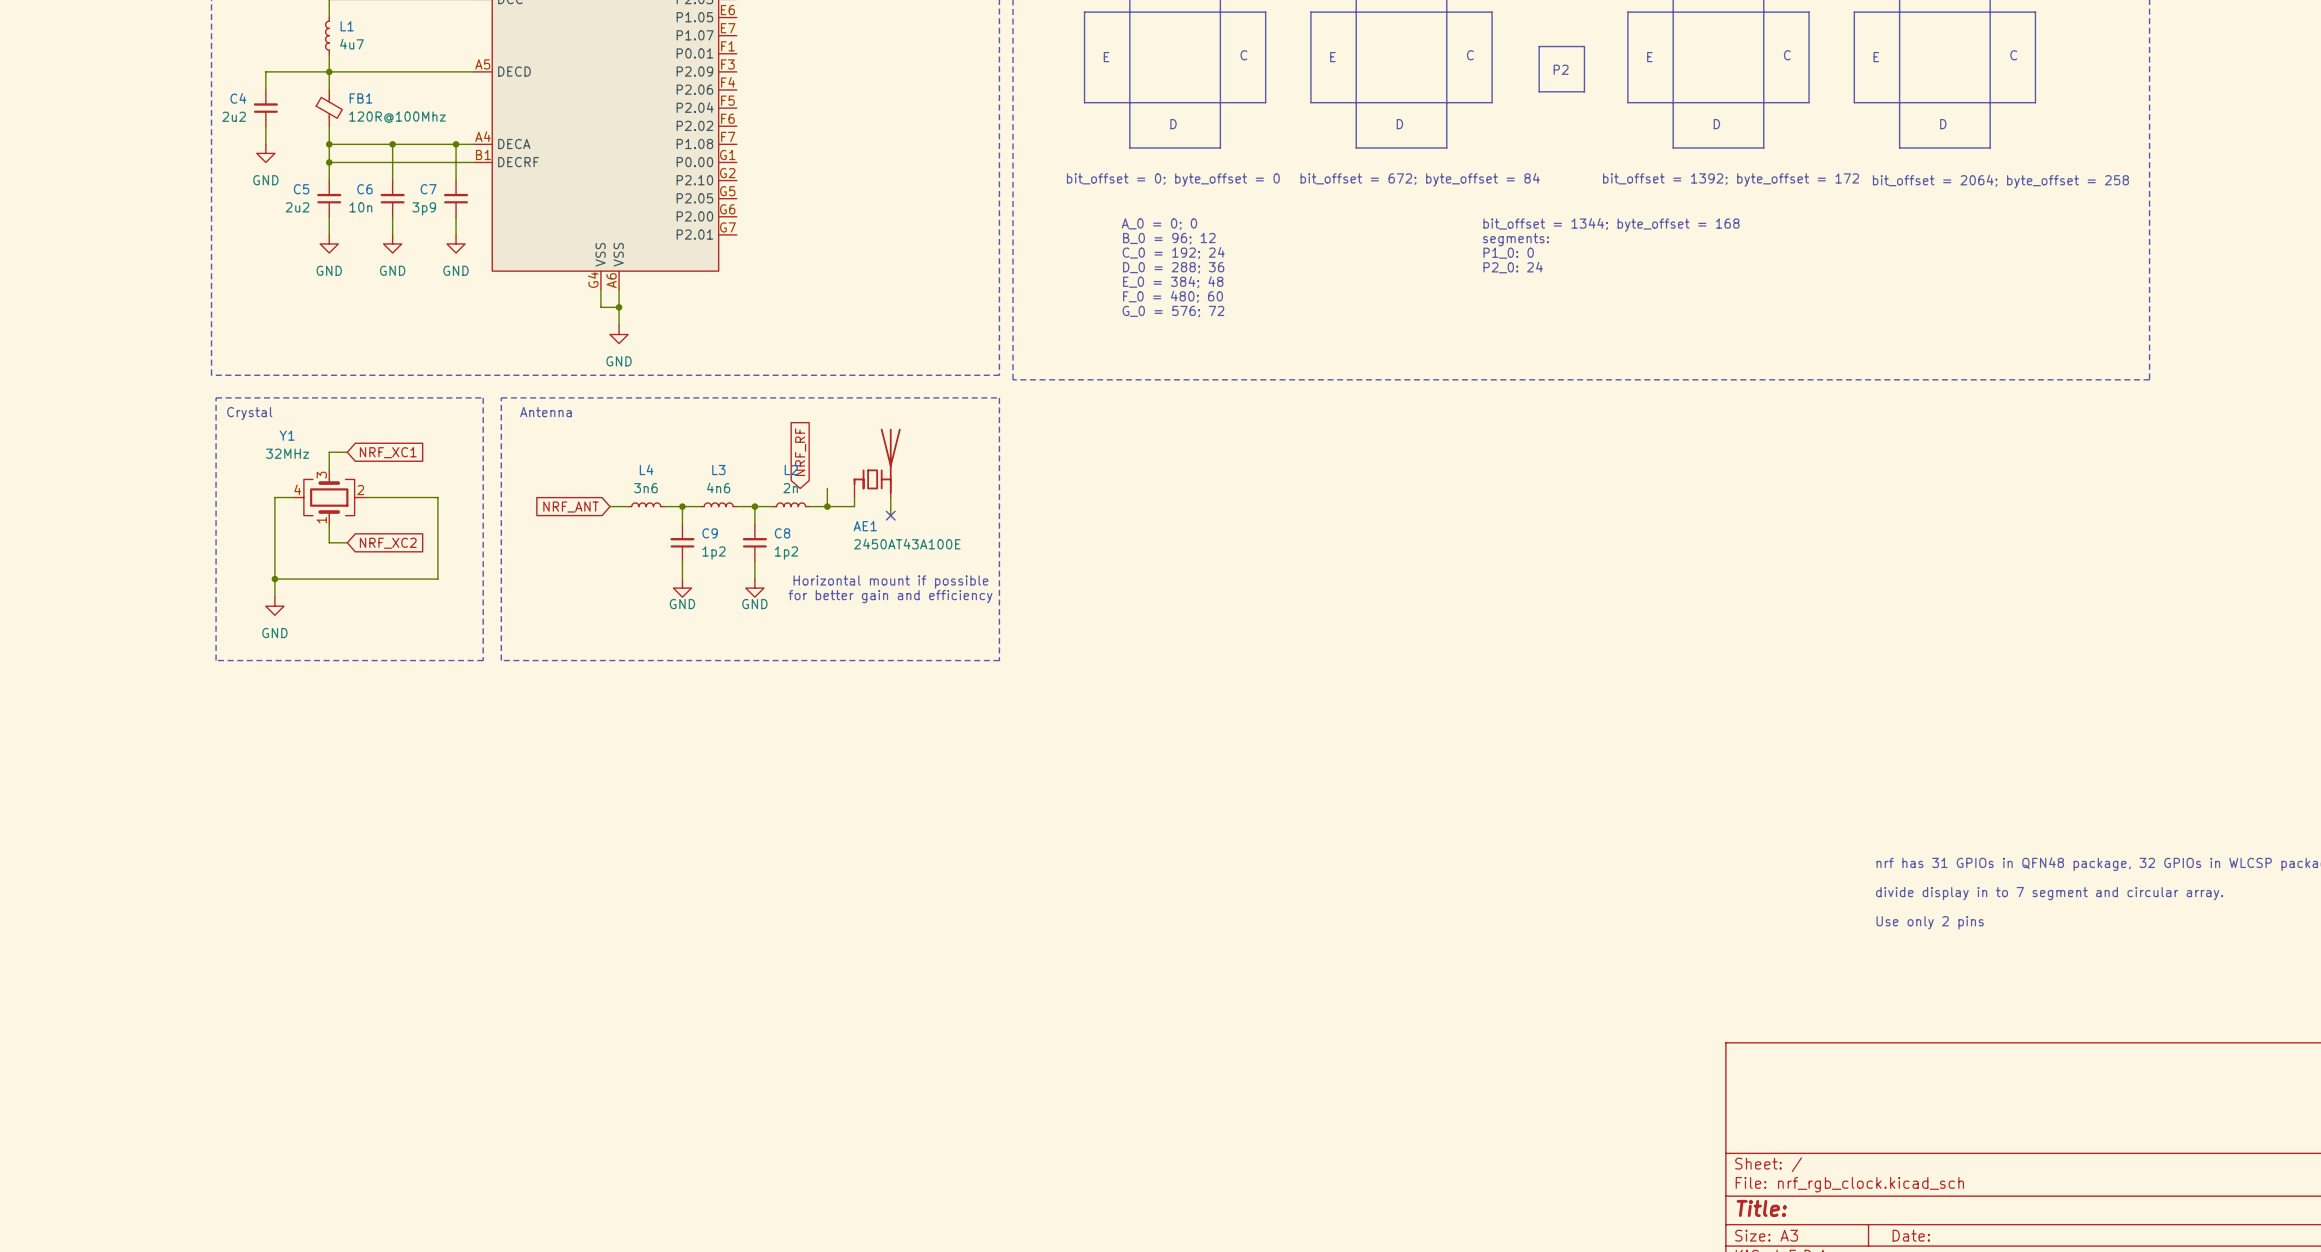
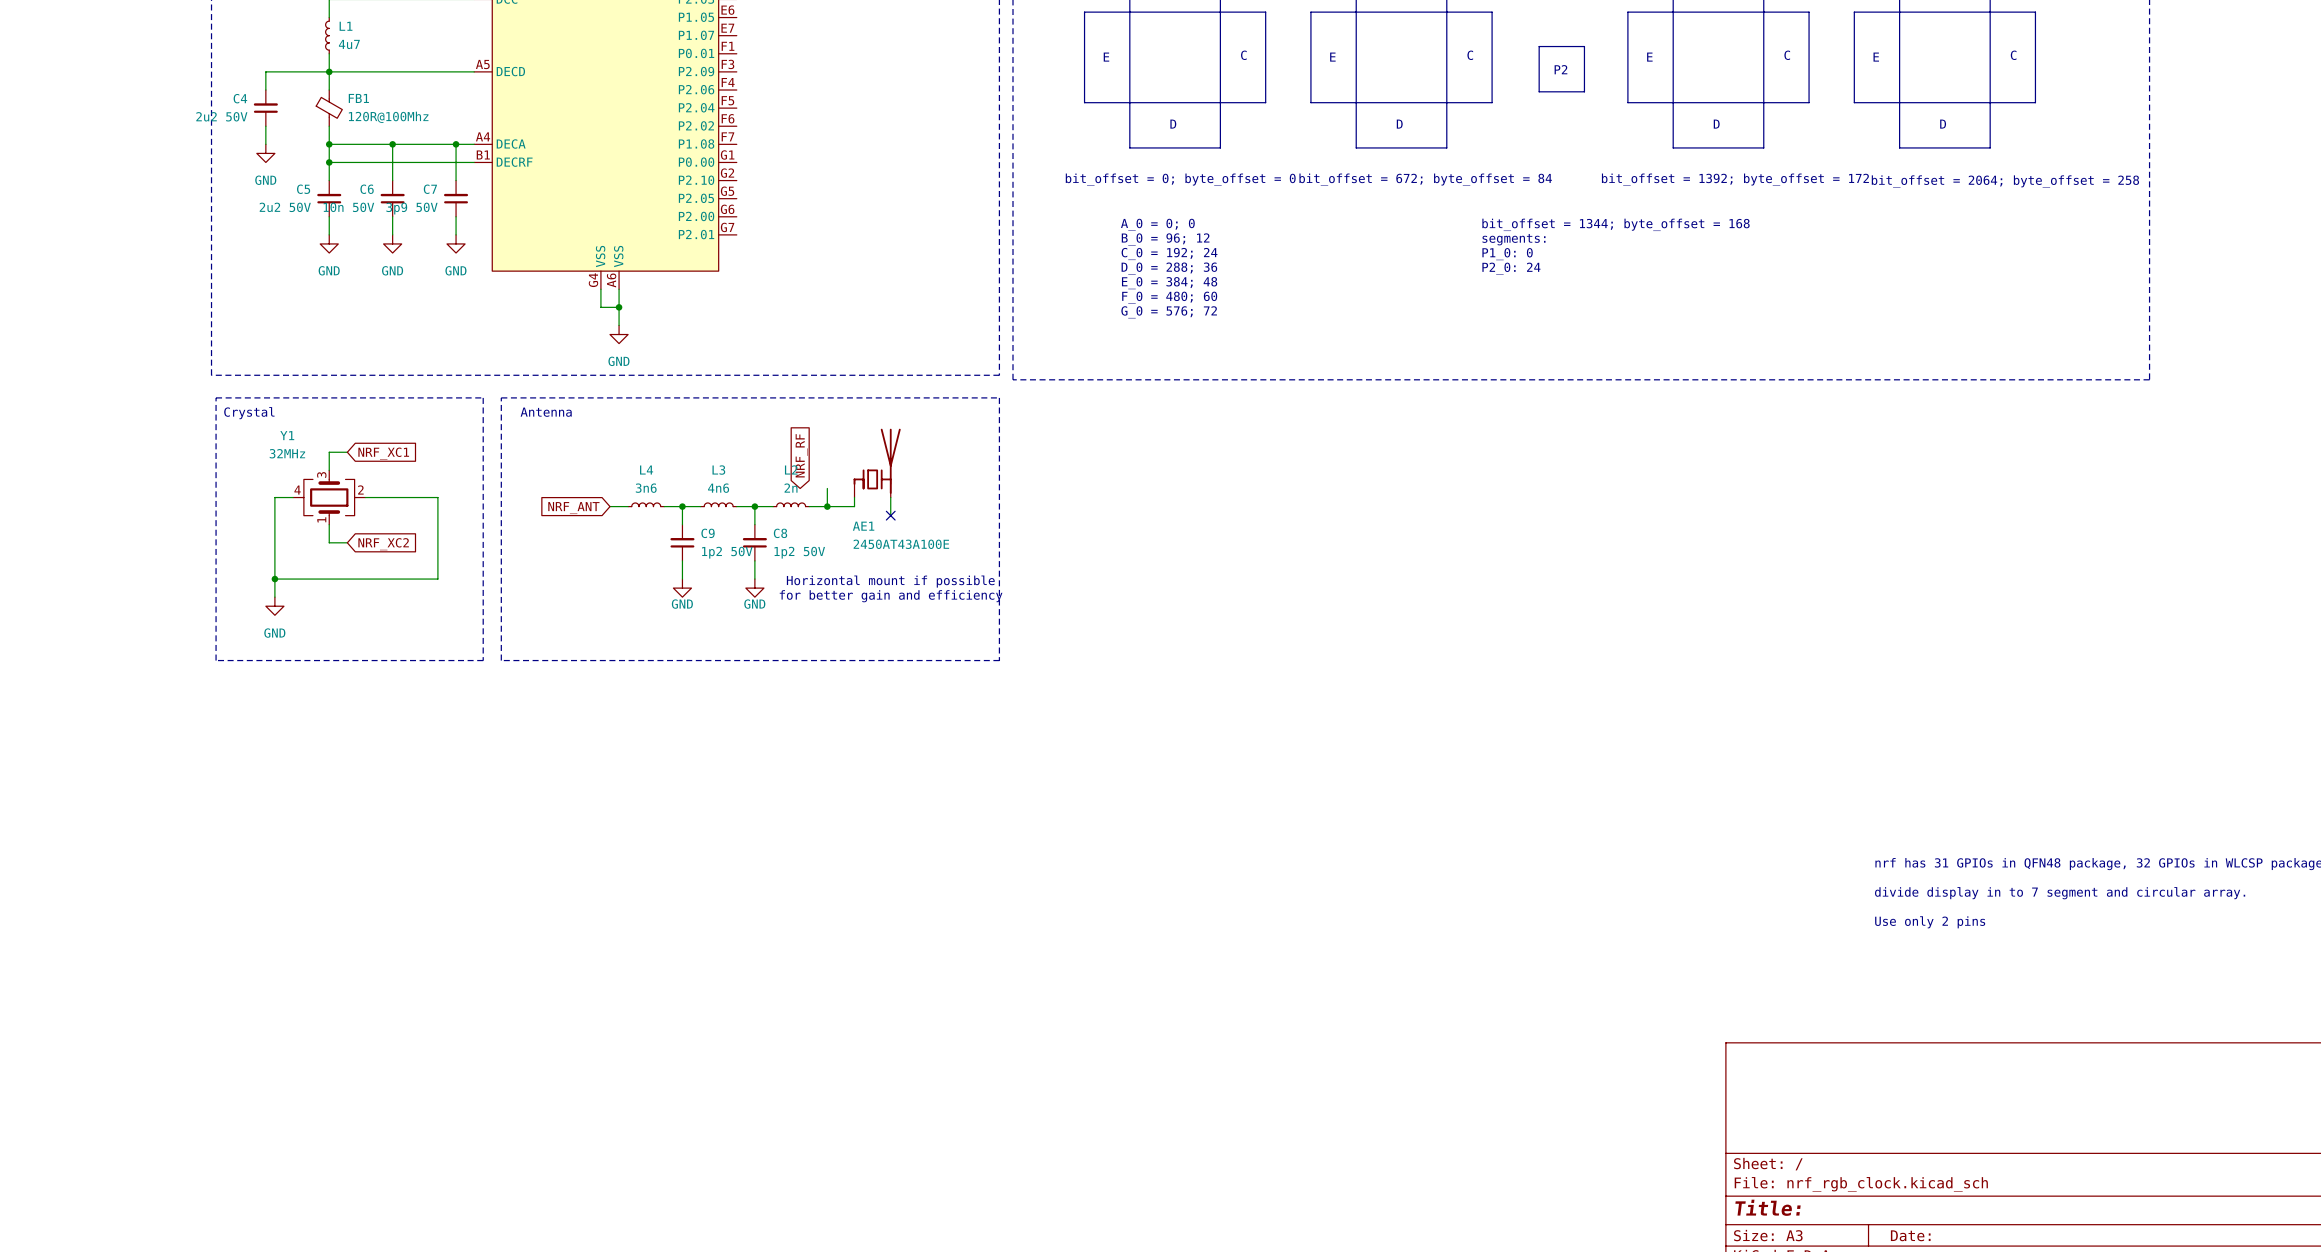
C4 value: 2u2 (234, 116) -> 2u2 50V (221, 116)
C5 value: 2u2 (297, 207) -> 2u2 50V (285, 207)
C6 value: 10n (360, 207) -> 10n 50V (348, 207)
C7 value: 3p9 (424, 208) -> 3p9 50V (411, 208)
C9 value: 1p2 (713, 553) -> 1p2 50V (727, 552)
C8 value: 1p2 (786, 553) -> 1p2 50V (799, 552)

